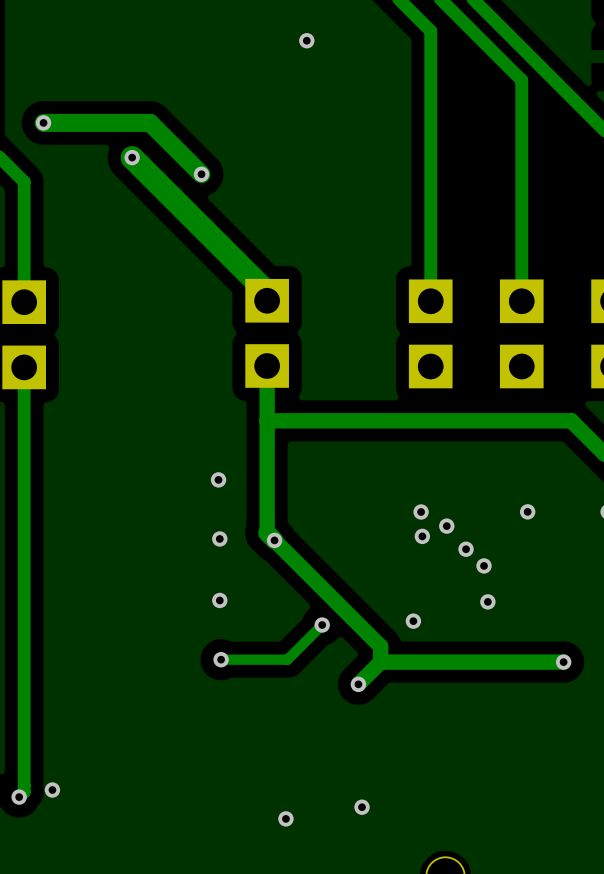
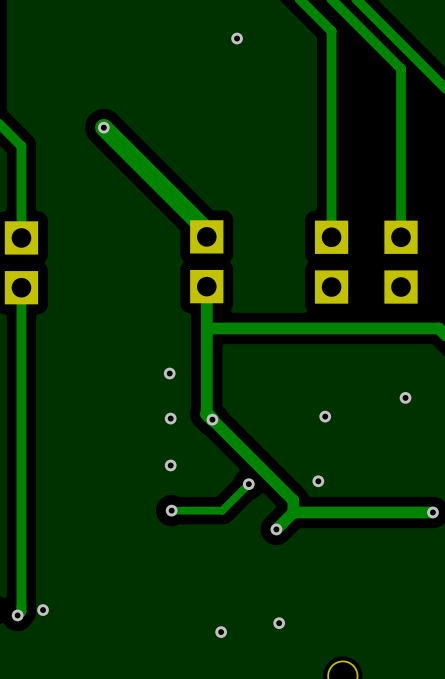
track: (43, 122) (150, 122) (201, 174) -> none
via: (43, 122) -> none
via: (201, 174) -> none
via: (421, 512) -> none
via: (446, 526) -> none
via: (466, 549) -> none
via: (484, 565) -> none
via: (487, 601) -> none

